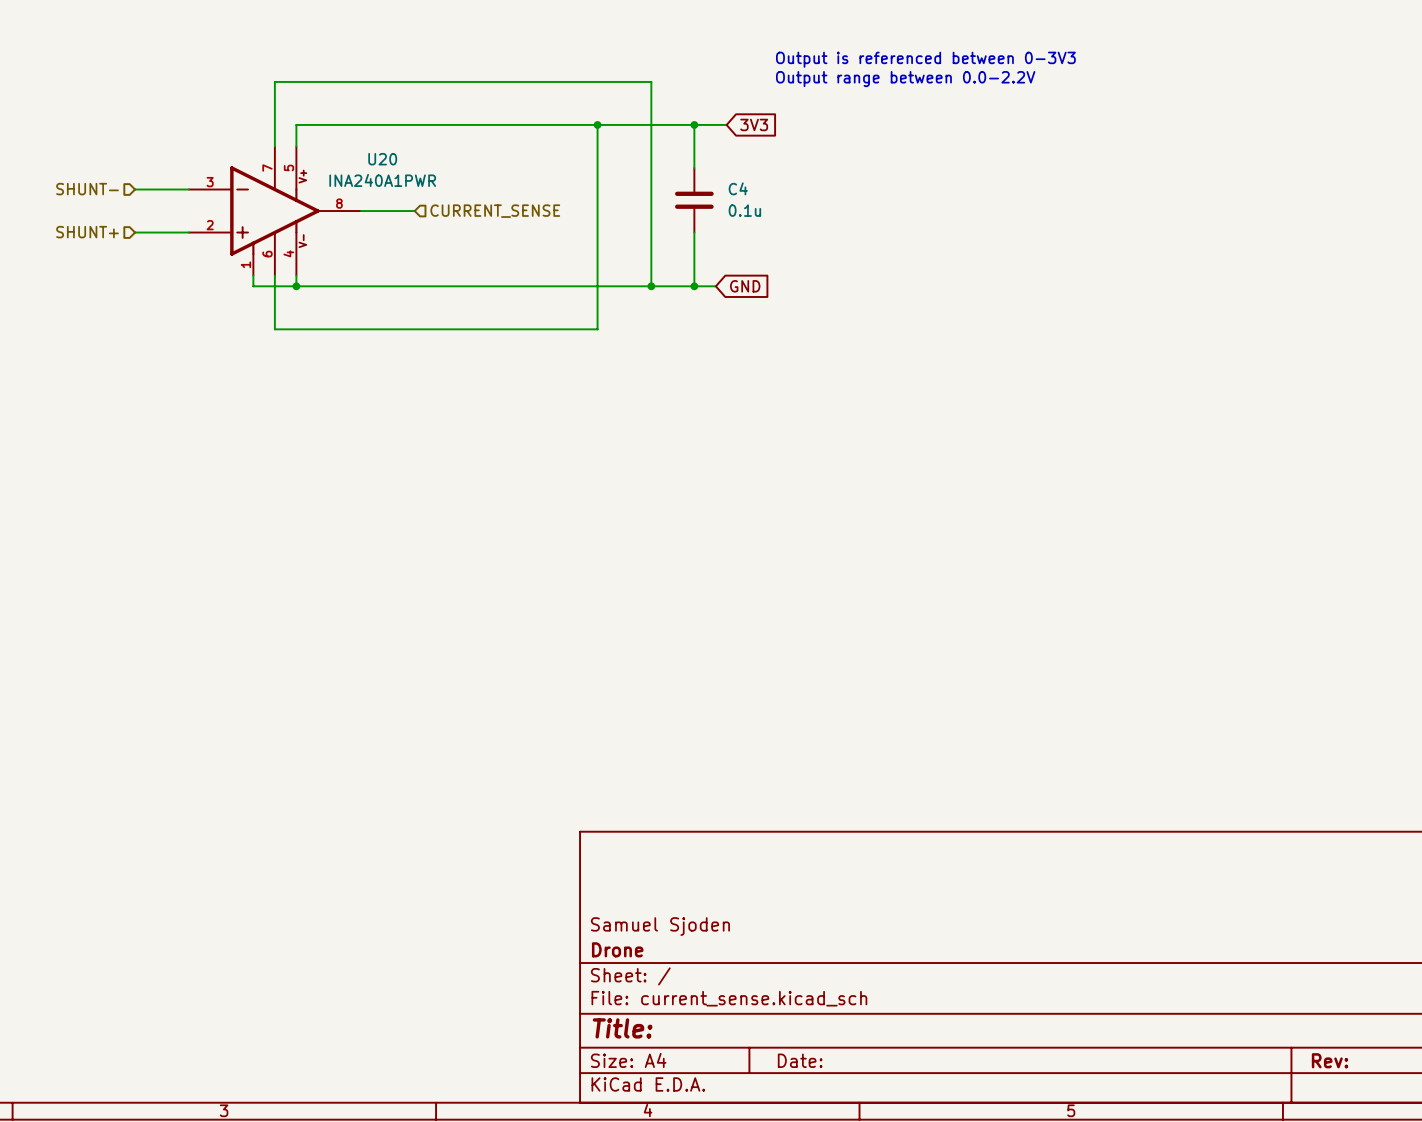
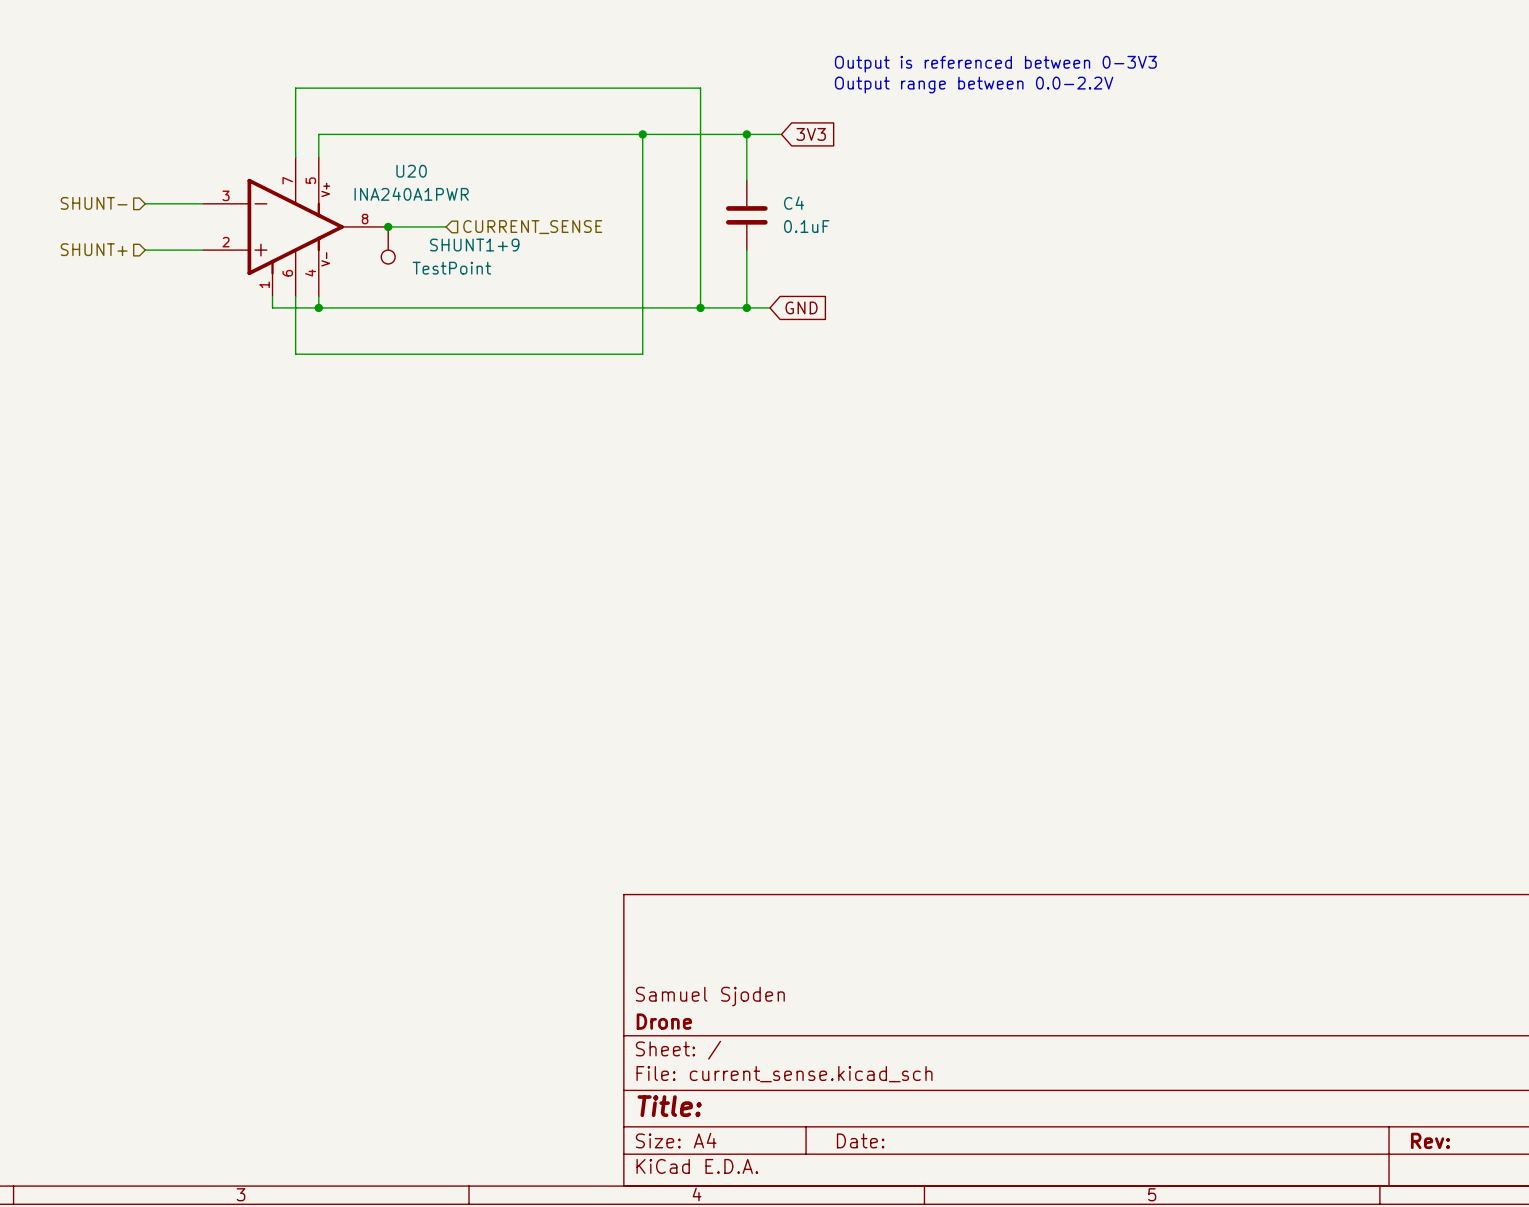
C4 value: 0.1u (744, 210) -> 0.1uF (806, 226)
junction: none -> (388, 226)
SHUNT1+9: none -> TestPoint (388, 245)

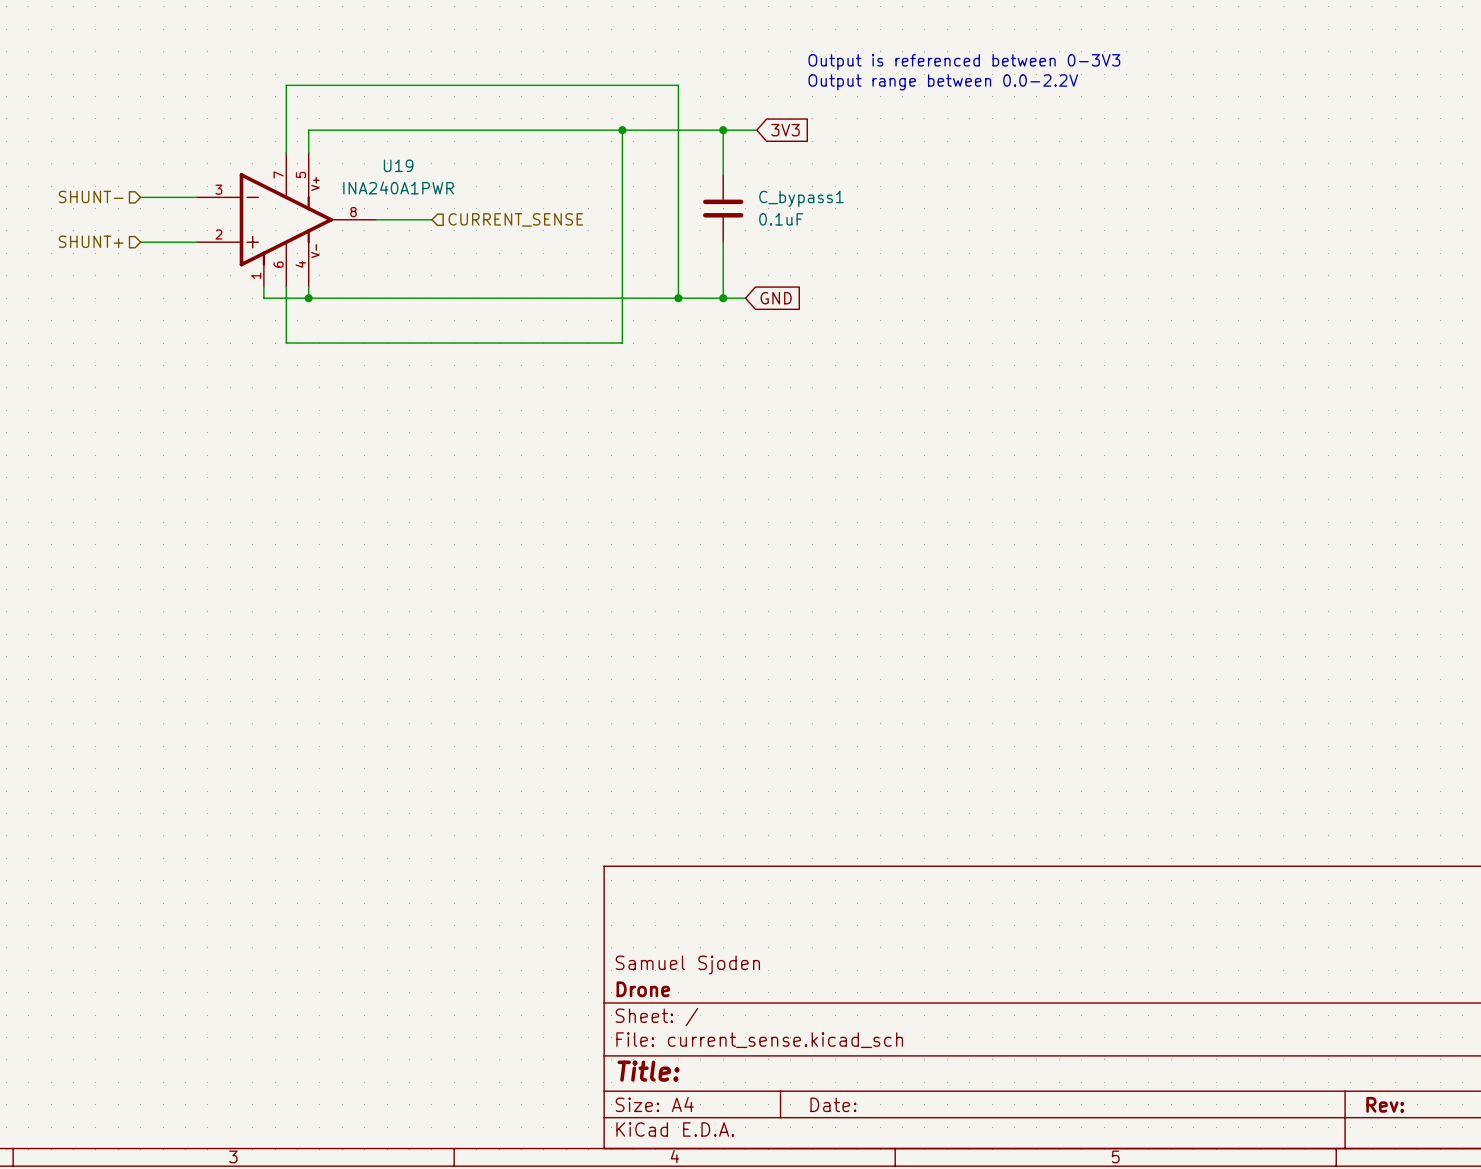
U20 name: U20 (411, 171) -> U19 (398, 165)
C4 name: C4 (794, 203) -> C_bypass1 (801, 198)
junction: (388, 226) -> none
SHUNT1+9: TestPoint (388, 245) -> none

